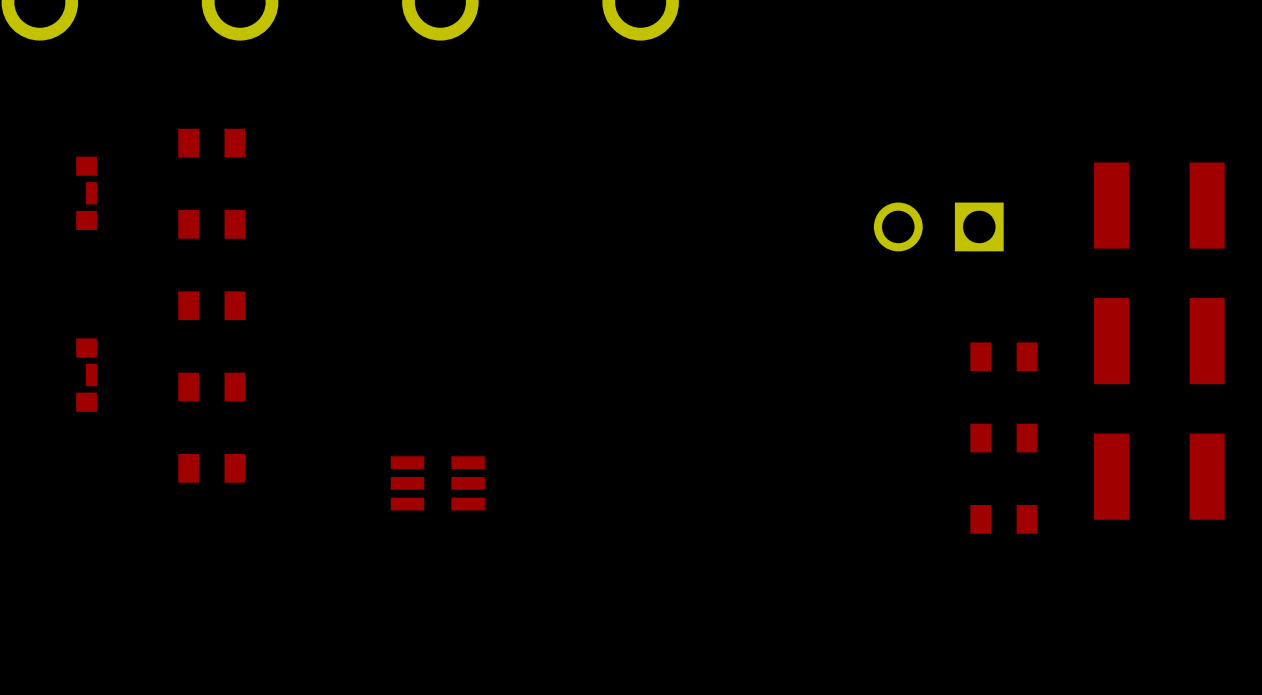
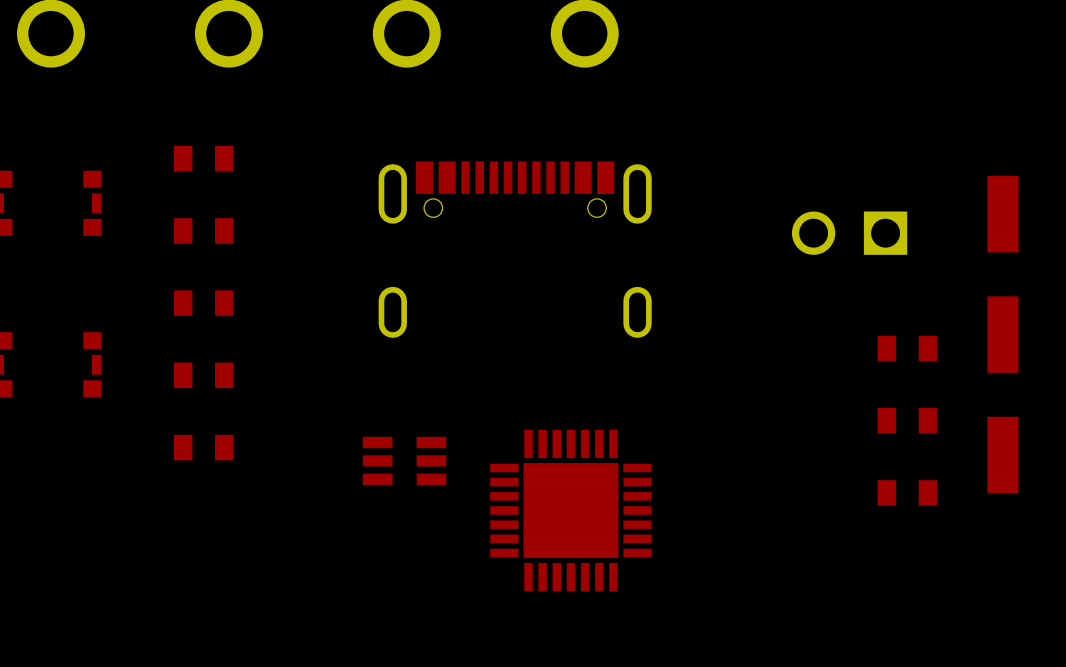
part: none -> (515, 249)
part: none -> (570, 510)

